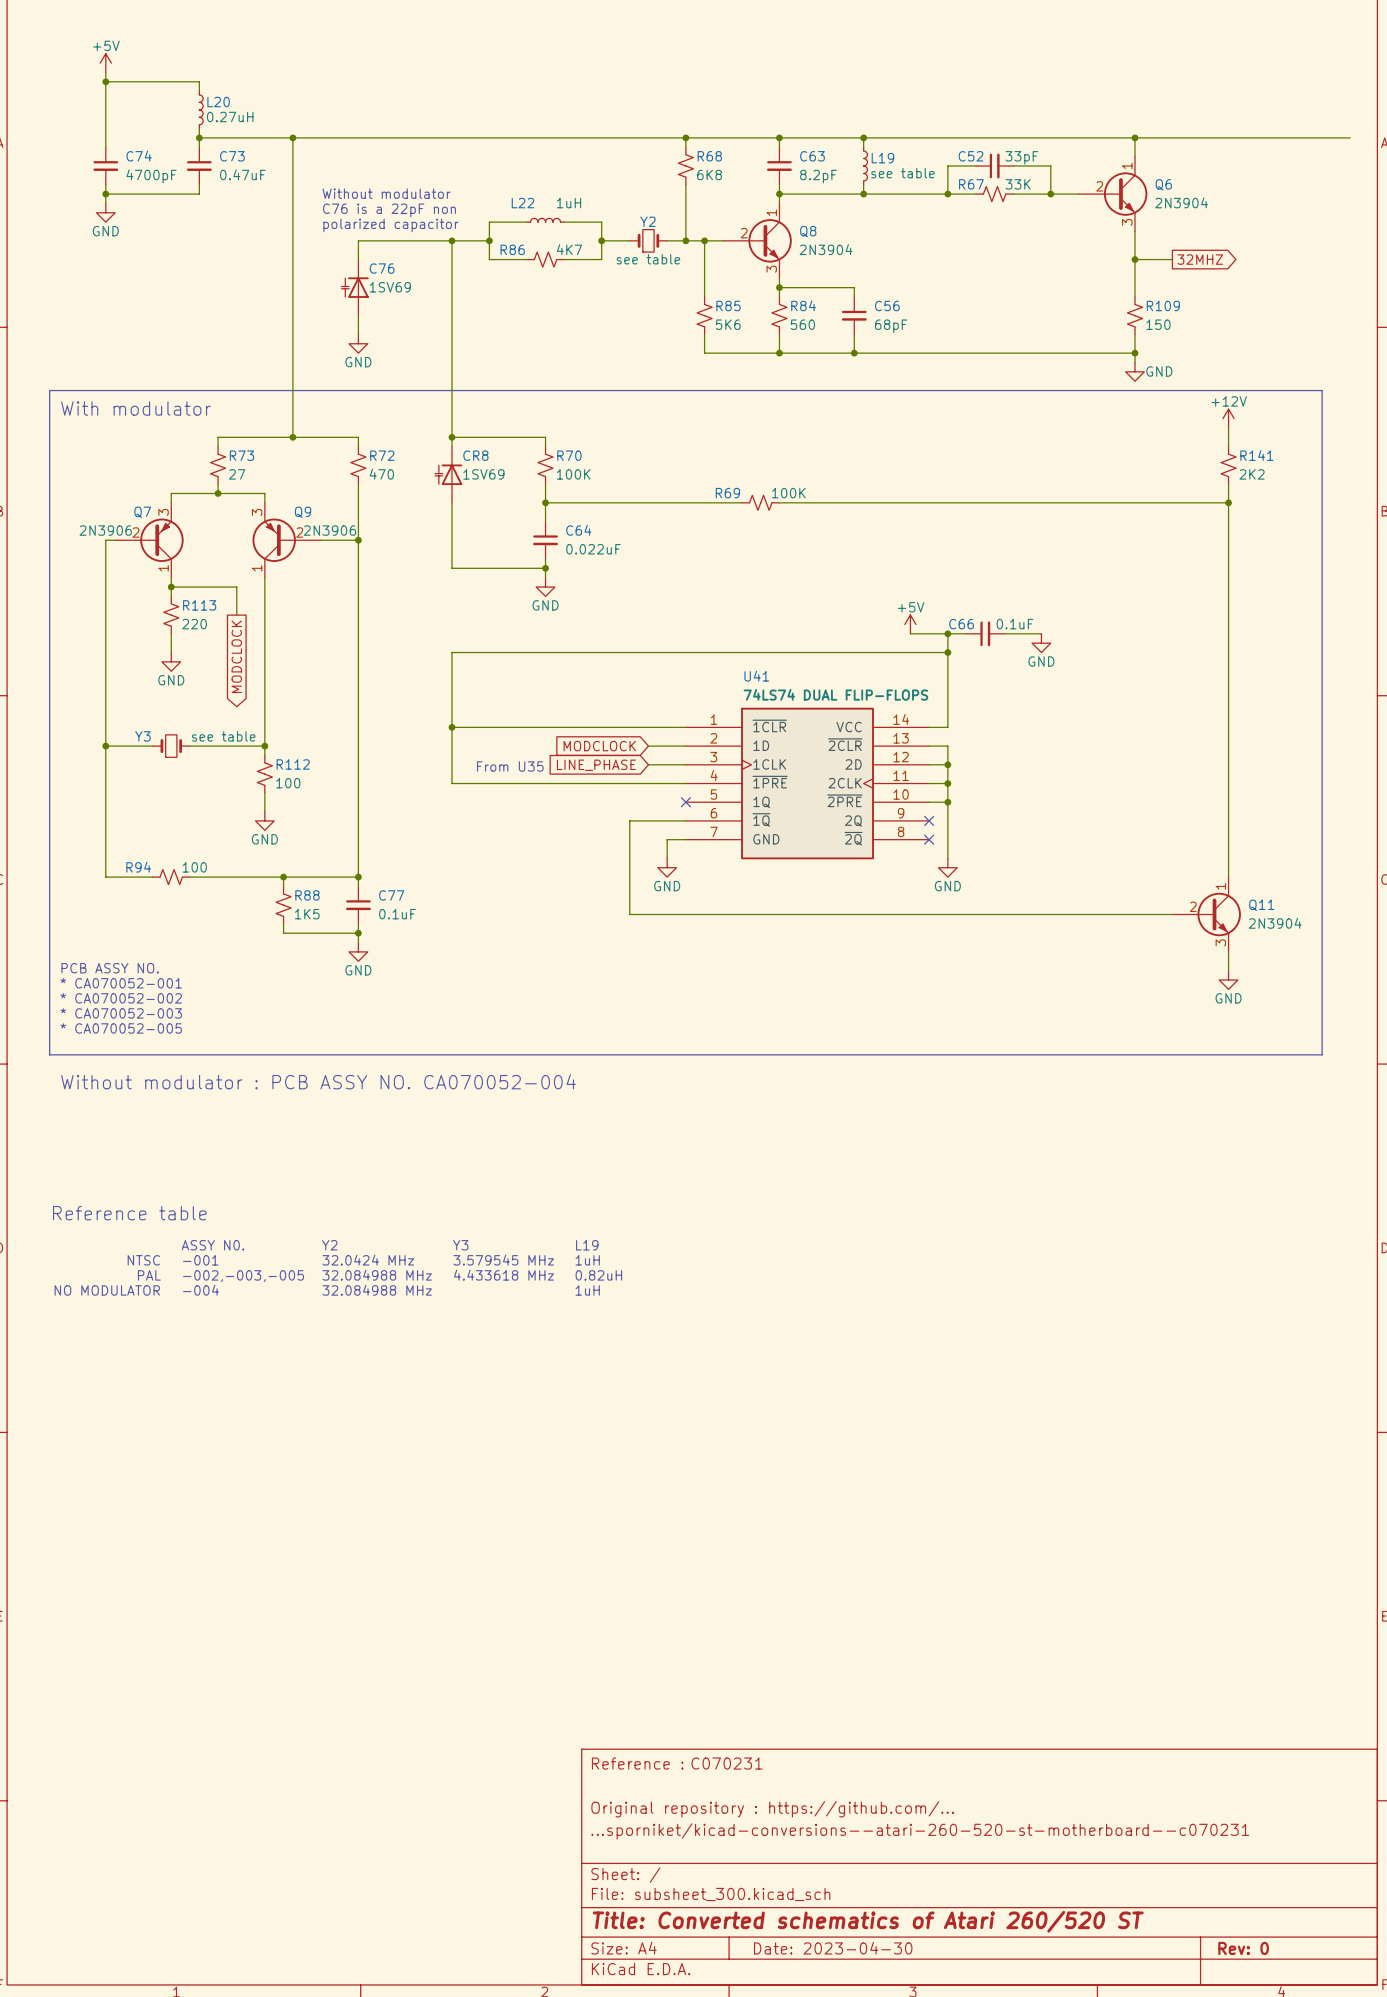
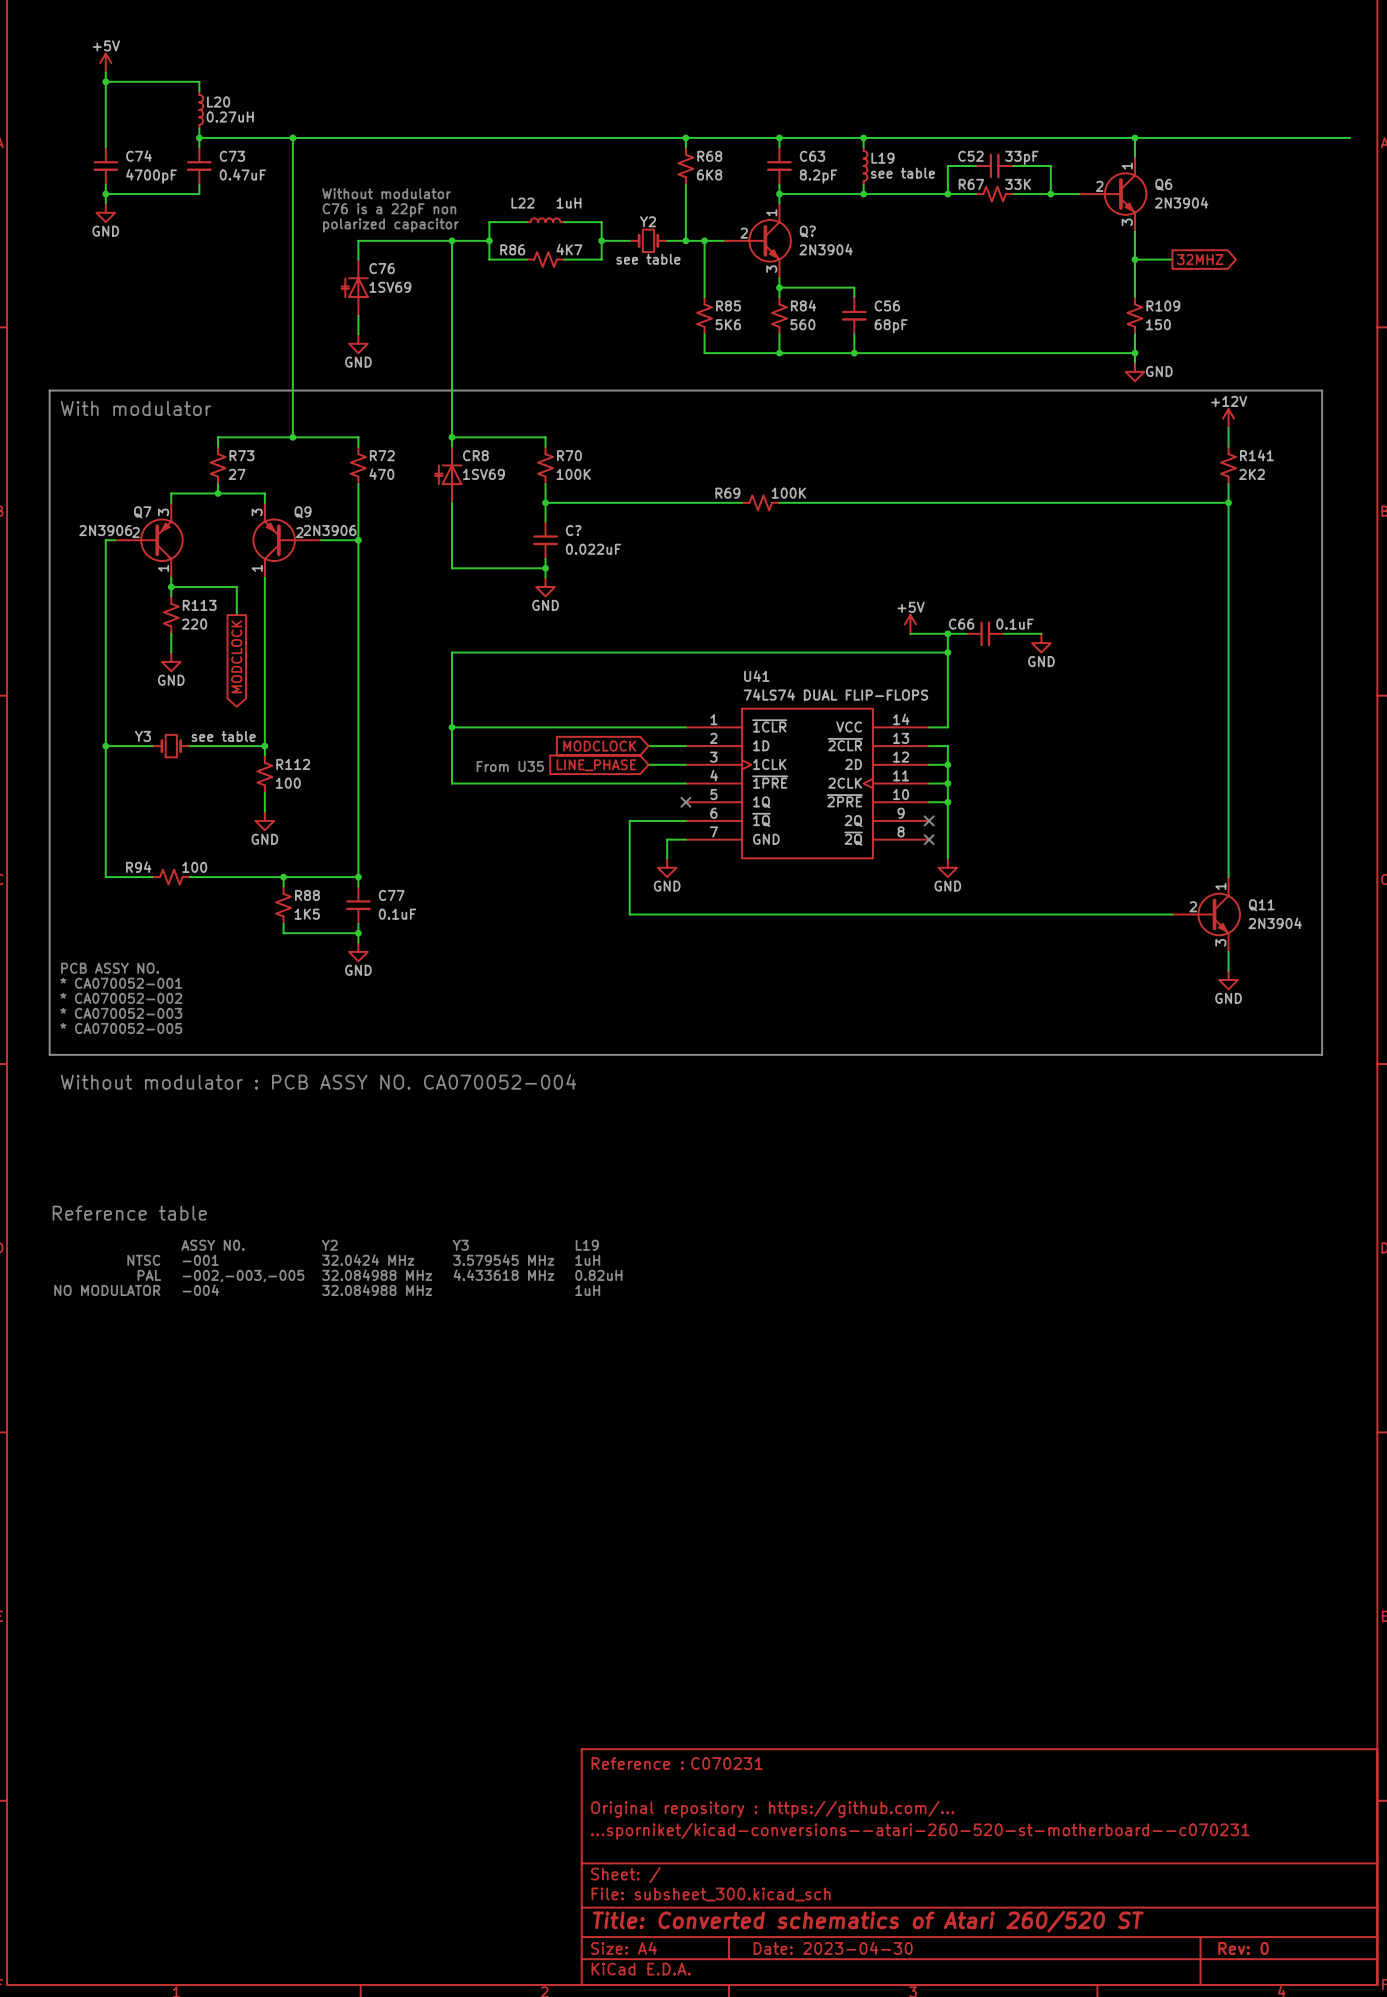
Q8 name: Q8 (808, 231) -> Q? (807, 231)
C64 name: C64 (578, 530) -> C? (573, 530)

